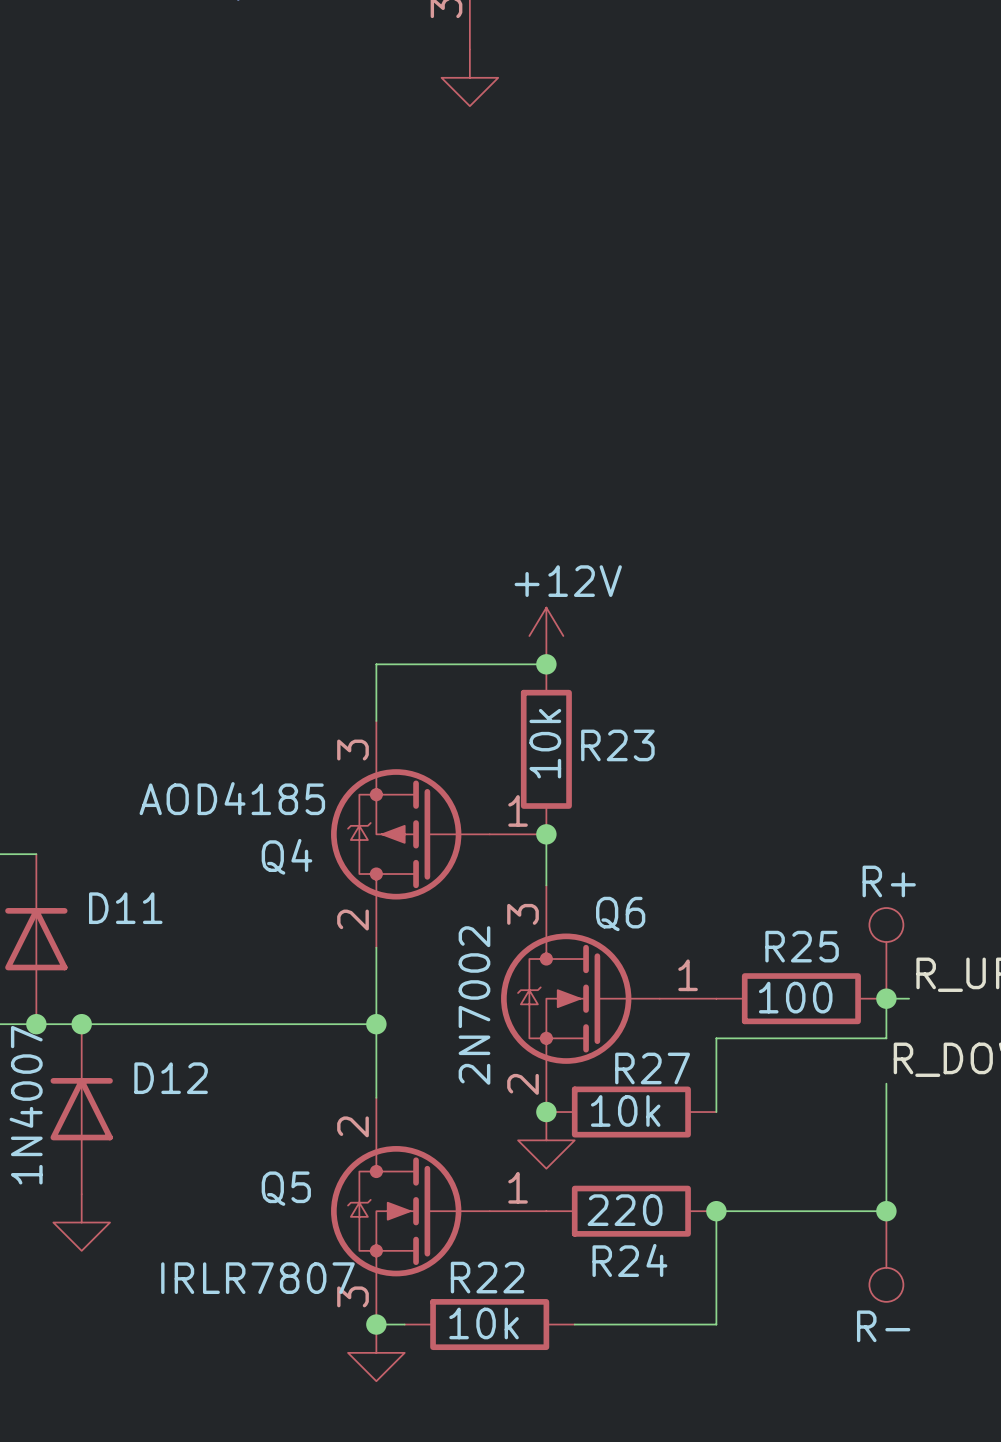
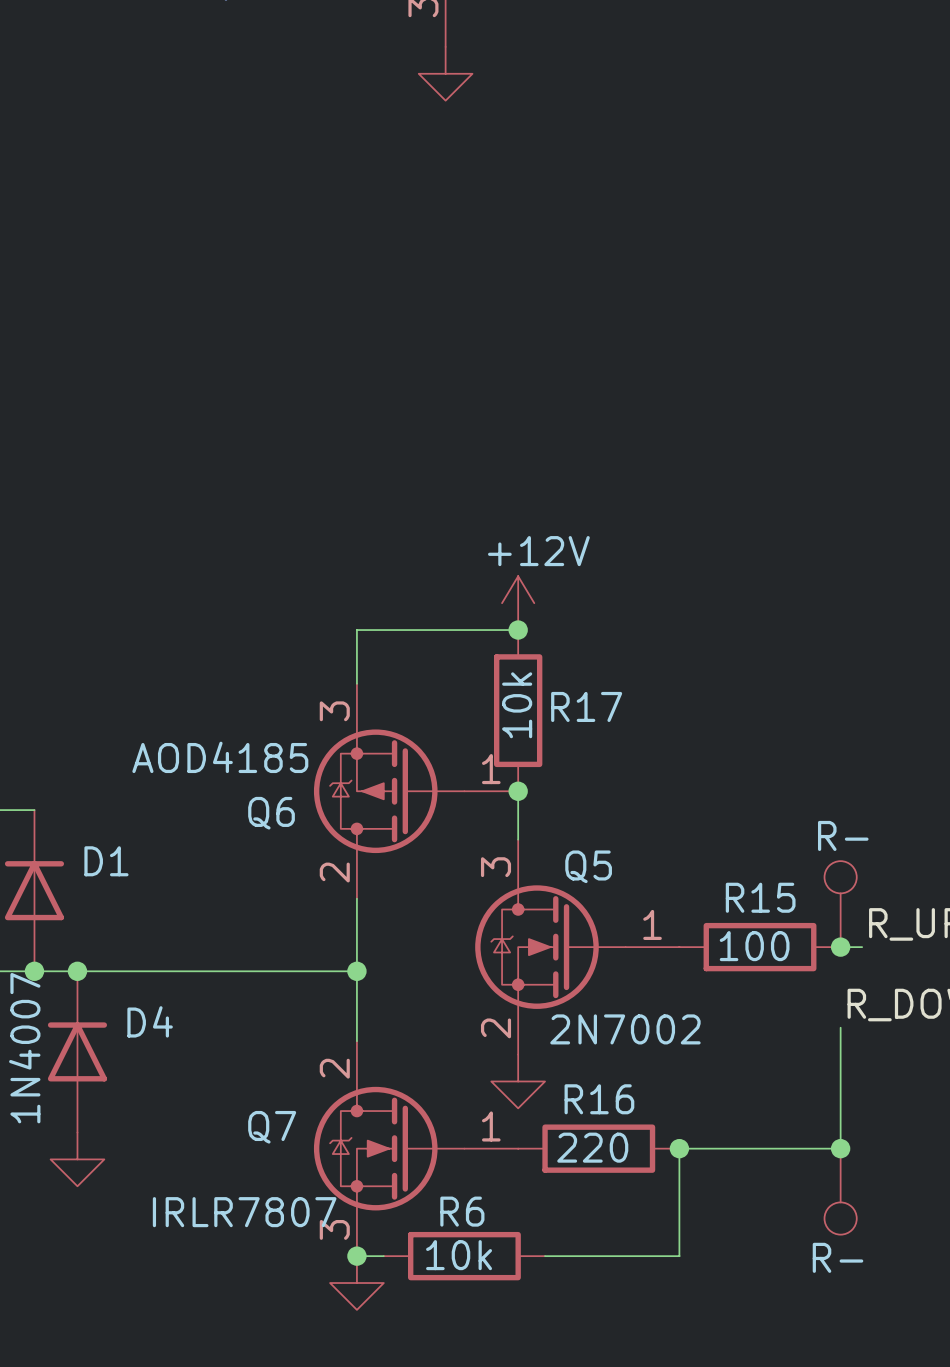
R23 name: R23 (617, 745) -> R17 (586, 706)
Q4 name: Q4 (286, 856) -> Q6 (271, 813)
part value: R+ (889, 881) -> R- (843, 835)
D11 name: D11 (125, 908) -> D1 (106, 861)
Q6 name: Q6 (620, 913) -> Q5 (588, 866)
R25 name: R25 (802, 946) -> R15 (760, 897)
wire: (886, 998) (886, 1038) (716, 1038) (716, 1112) -> none
Q6 value rotation: 0° (474, 1005) -> 90° clockwise (625, 1029)
Q6 value position: 2N7002 (474, 1005) -> 2N7002 (625, 1029)
D12 name: D12 (171, 1078) -> D4 (150, 1021)
junction: (546, 1112) -> none
R27: 10k (631, 1112) -> none
Q5 name: Q5 (286, 1188) -> Q7 (272, 1127)
R24 name: R24 (629, 1260) -> R16 (599, 1099)
R22 name: R22 (487, 1277) -> R6 (462, 1211)

